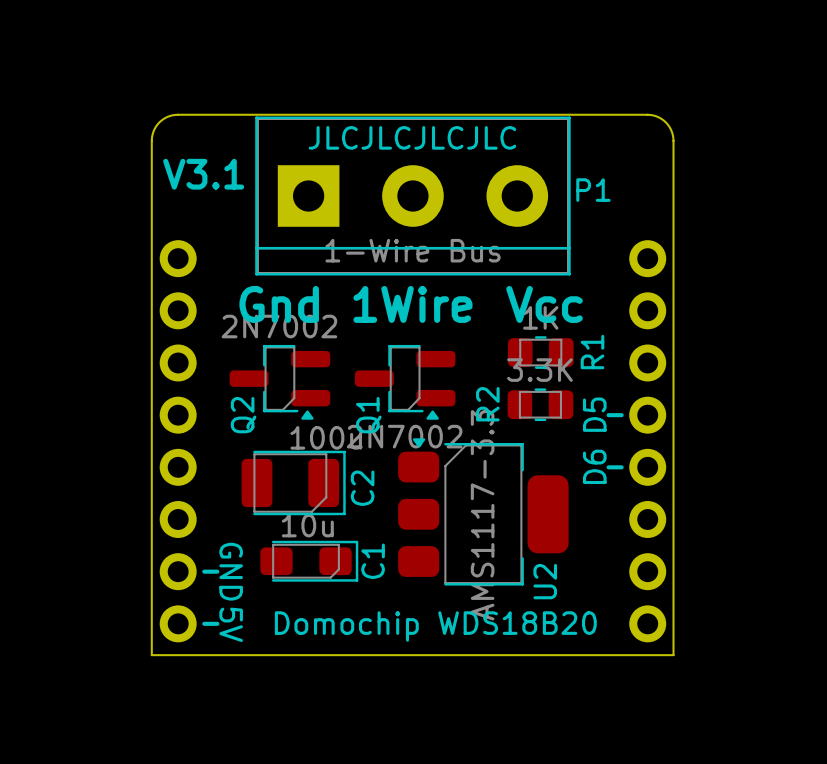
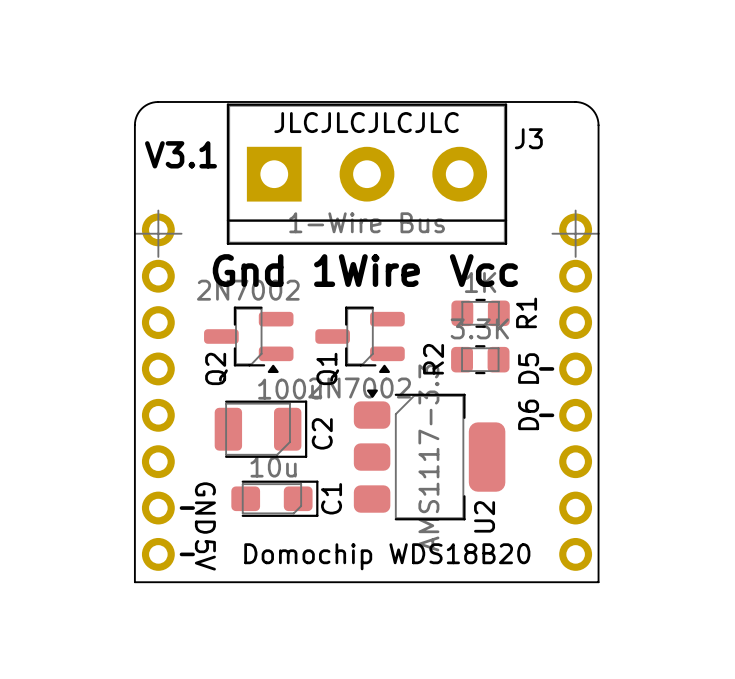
P1 name: P1 (593, 190) -> J3 (528, 138)
line: none -> (158, 210) (158, 256)
line: none -> (575, 210) (575, 256)
line: none -> (135, 233) (181, 233)
line: none -> (552, 233) (598, 233)

